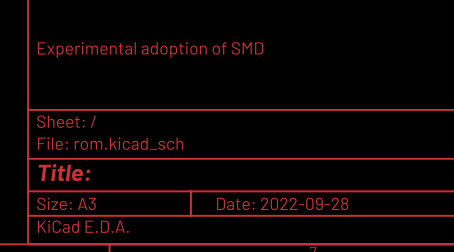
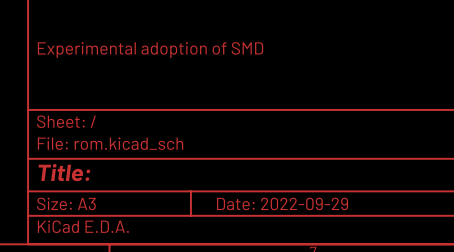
title block: Date: 2022-09-28 (282, 203) -> Date: 2022-09-29 (282, 203)

